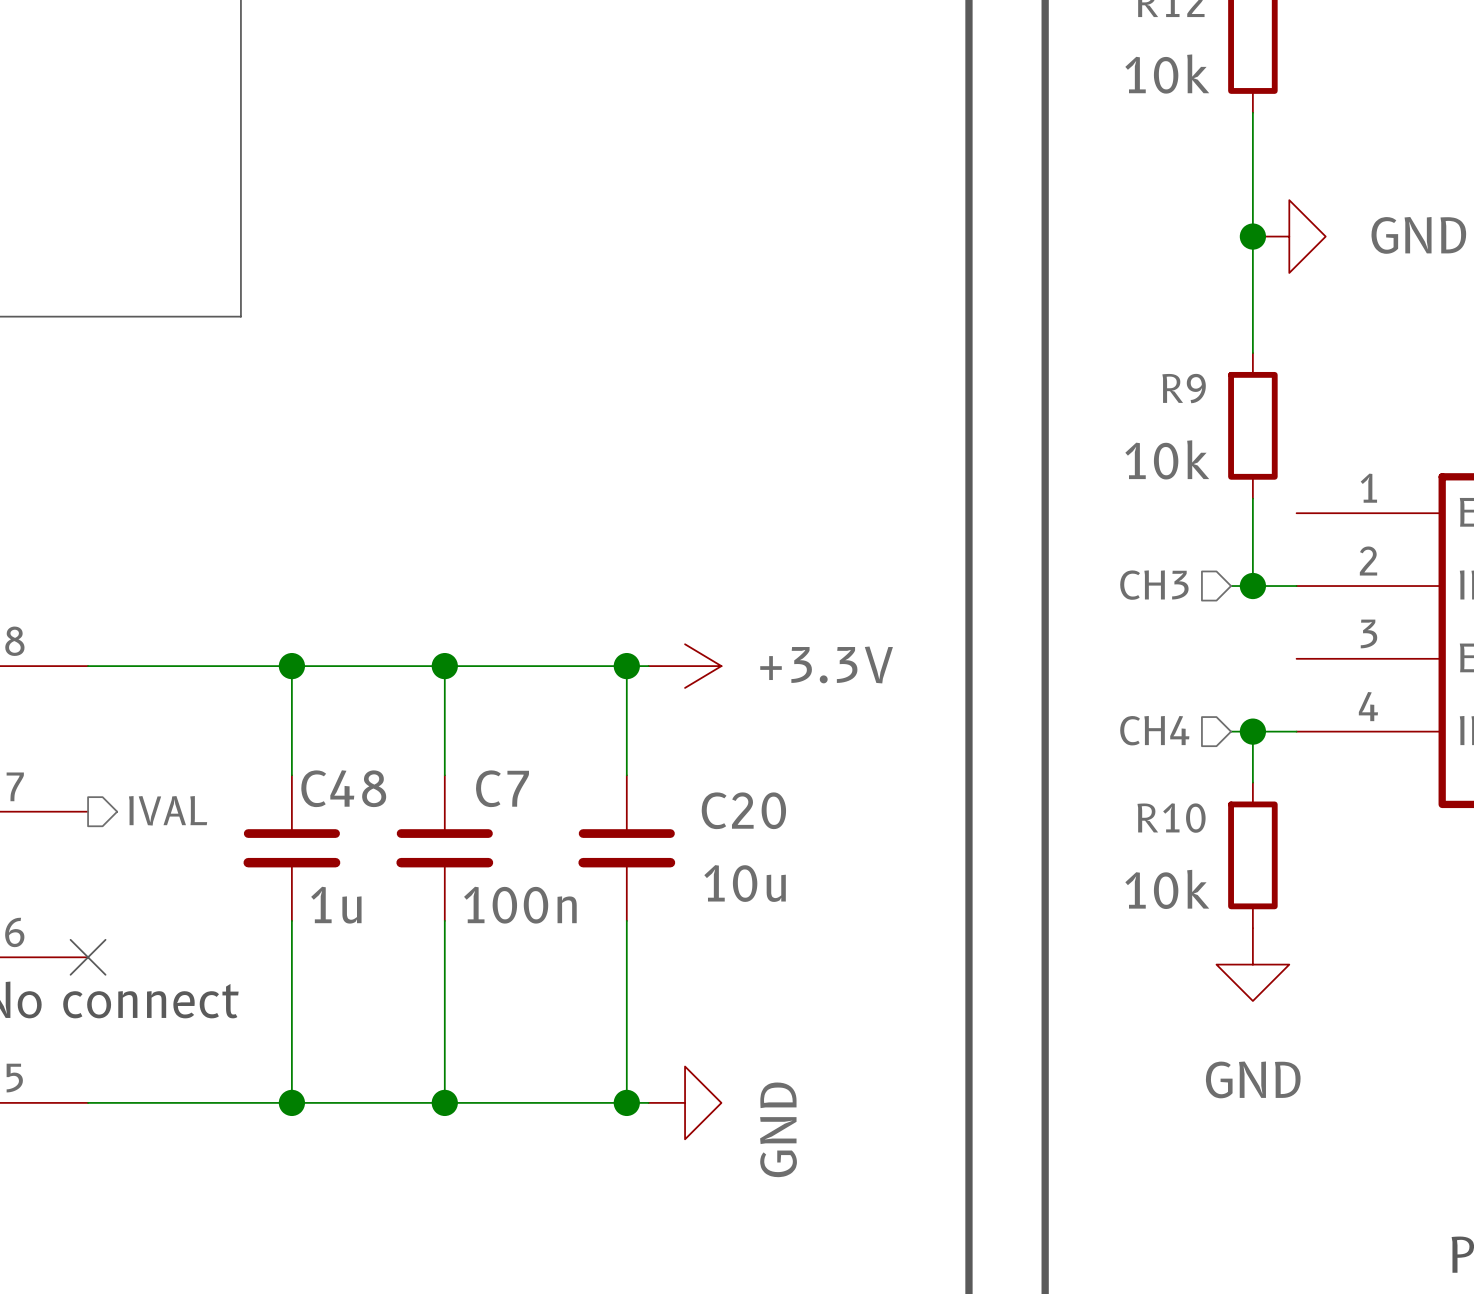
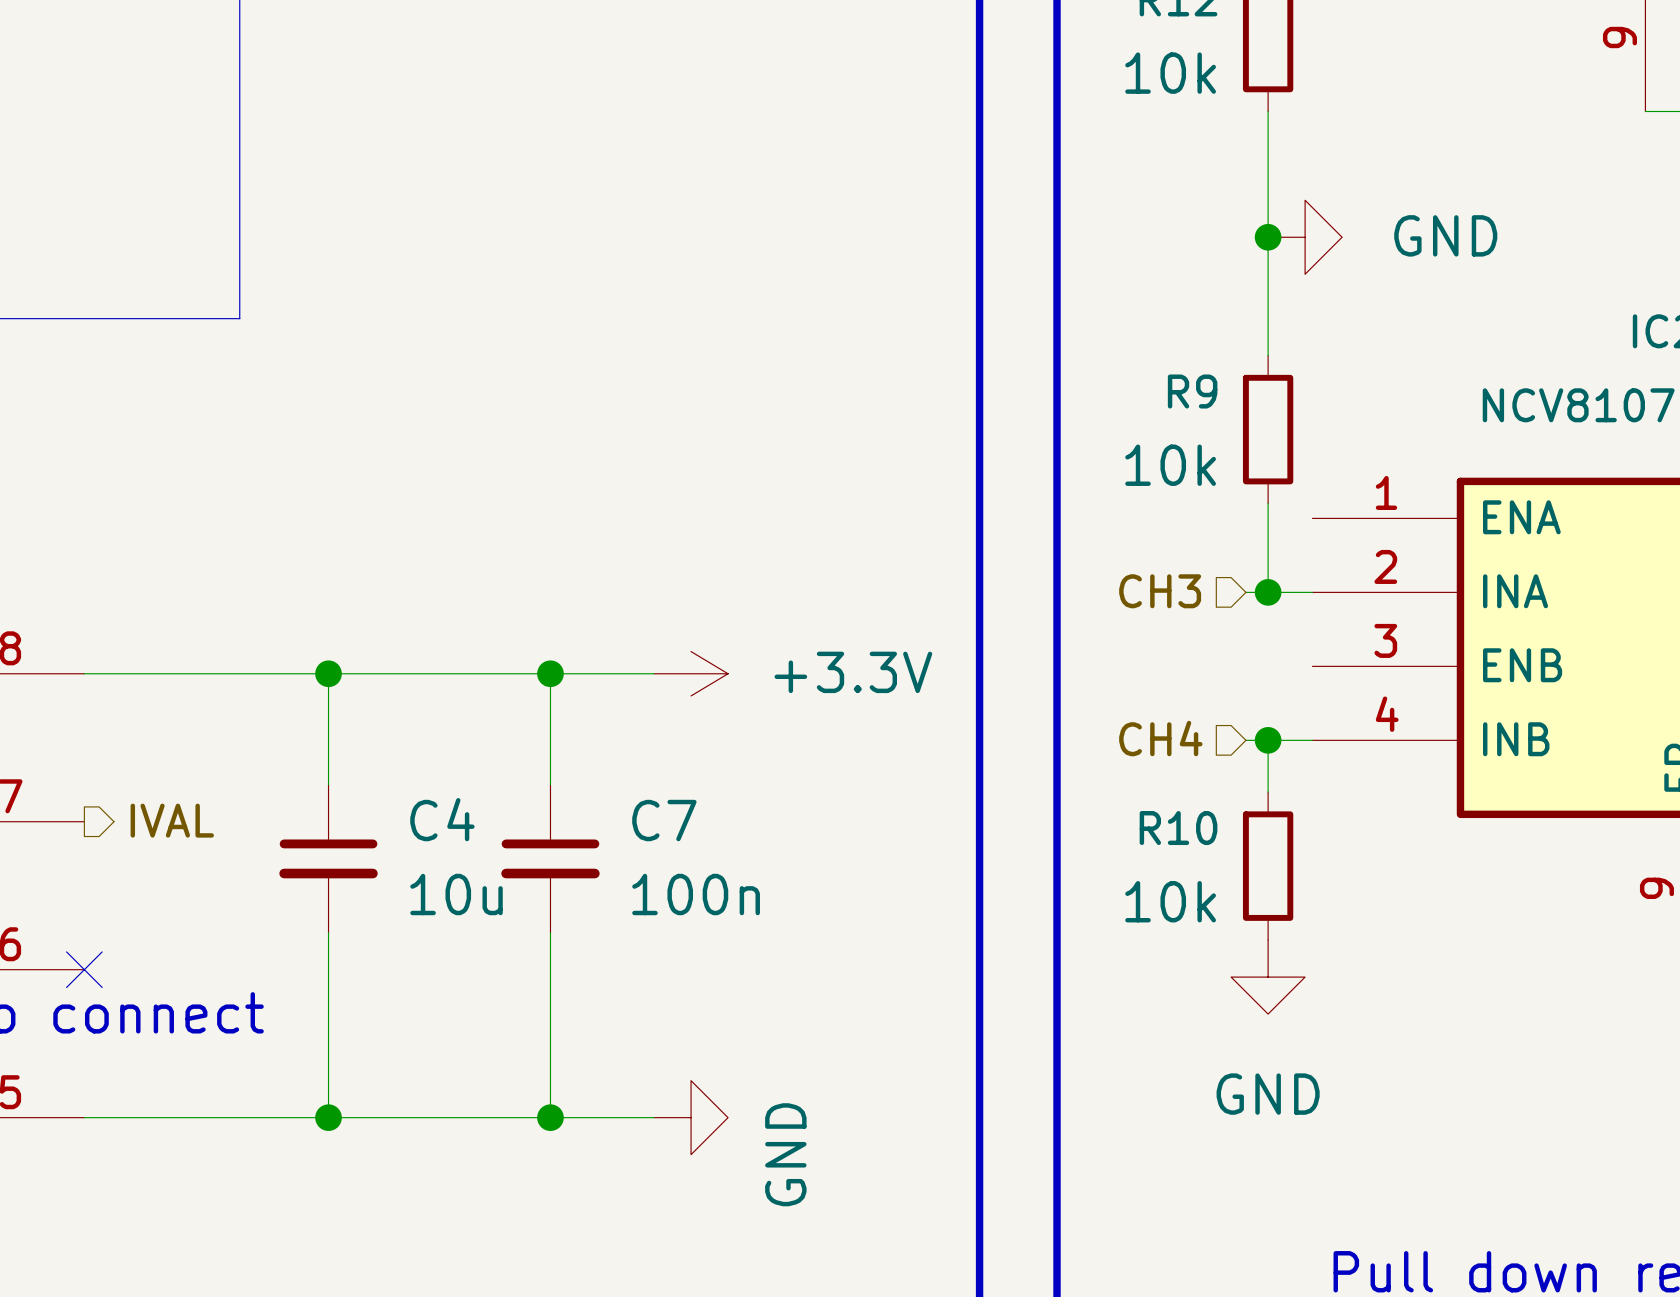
wire: (291, 666) (291, 775) -> (328, 673) (328, 784)
junction position: (291, 666) -> (328, 673)
wire: (444, 666) (444, 775) -> none
junction: (444, 666) -> none
junction: none -> (550, 673)
wire: (626, 666) (626, 775) -> (550, 673) (550, 784)
junction: (626, 666) -> none
C7 name position: C7 (502, 788) -> C7 (664, 820)
C48: 1u (291, 848) -> none
C4: none -> 10u (328, 858)
C7 position: (444, 848) -> (550, 858)
C20: 10u (626, 848) -> none
C7 value position: 100n (520, 905) -> 100n (696, 894)
wire: (291, 920) (291, 1102) -> (328, 932) (328, 1117)
wire: (444, 920) (444, 1102) -> none
wire: (626, 920) (626, 1102) -> (550, 932) (550, 1117)
junction position: (291, 1102) -> (328, 1117)
junction: (444, 1102) -> none
junction: none -> (550, 1117)
junction: (626, 1102) -> none

